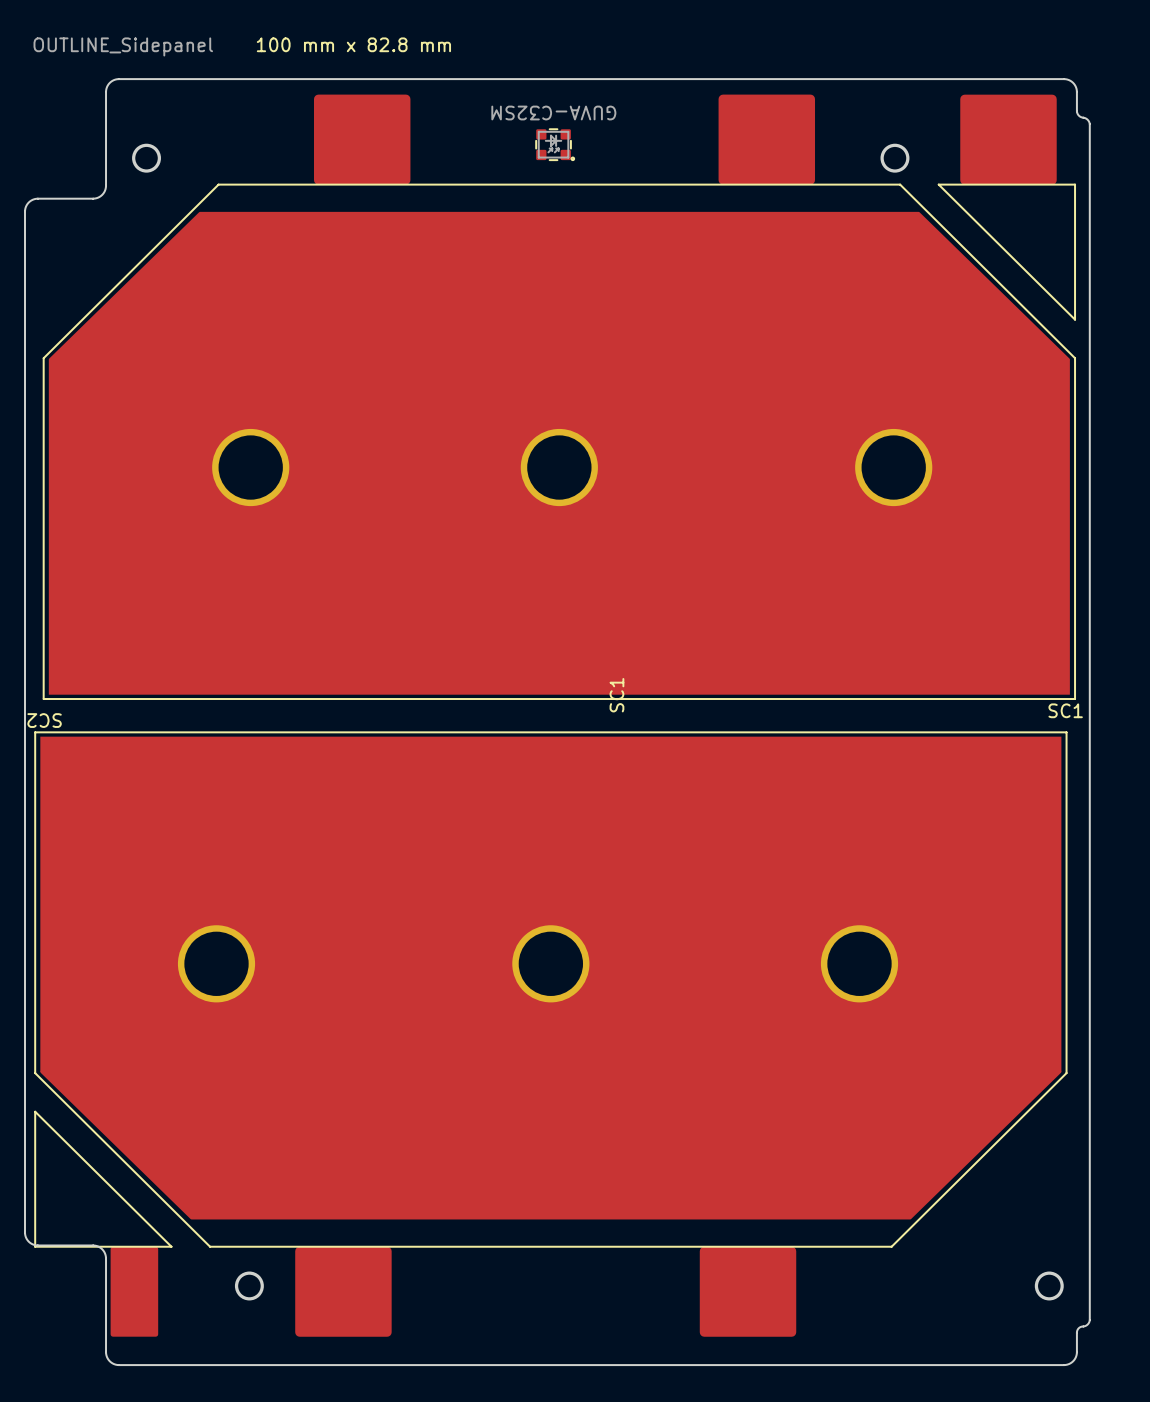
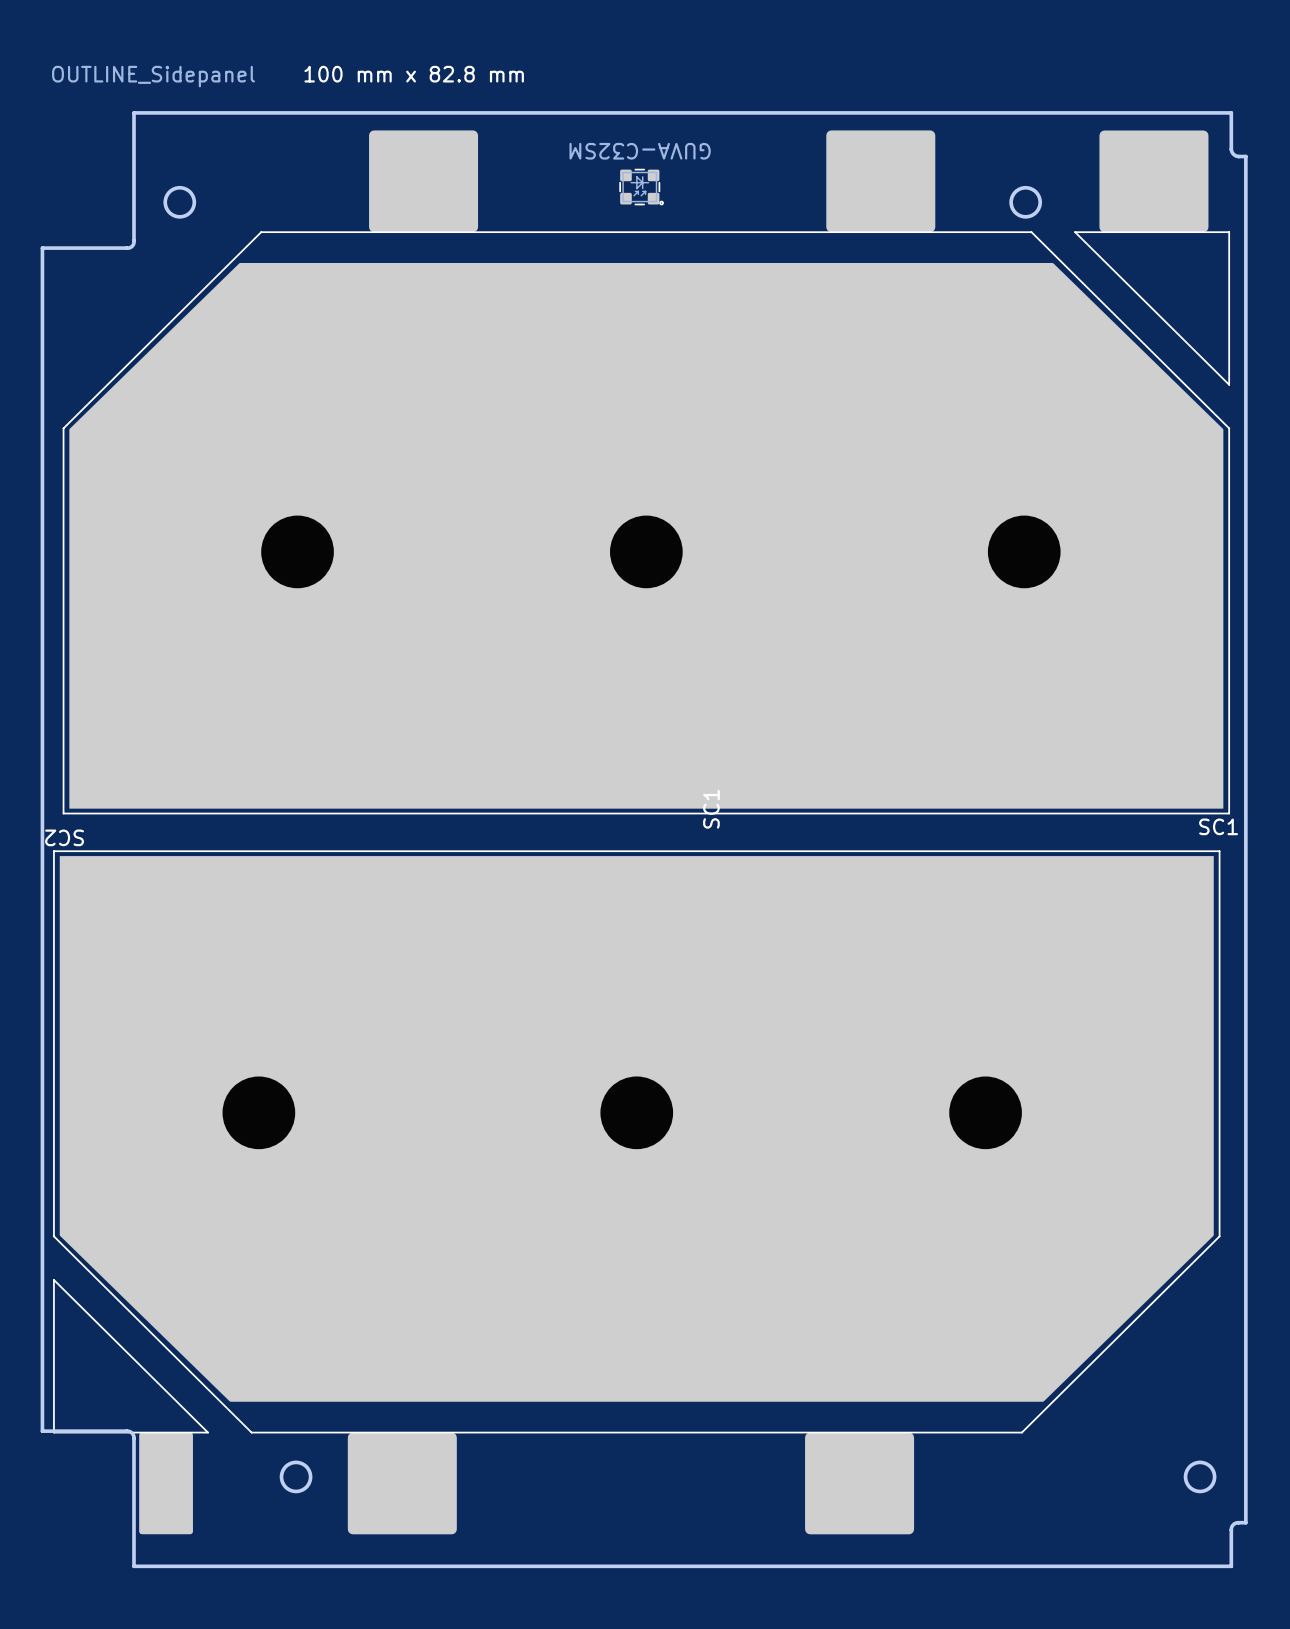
drawing shape: [24, 37, 1091, 1366] -> [40, 65, 1248, 1569]

